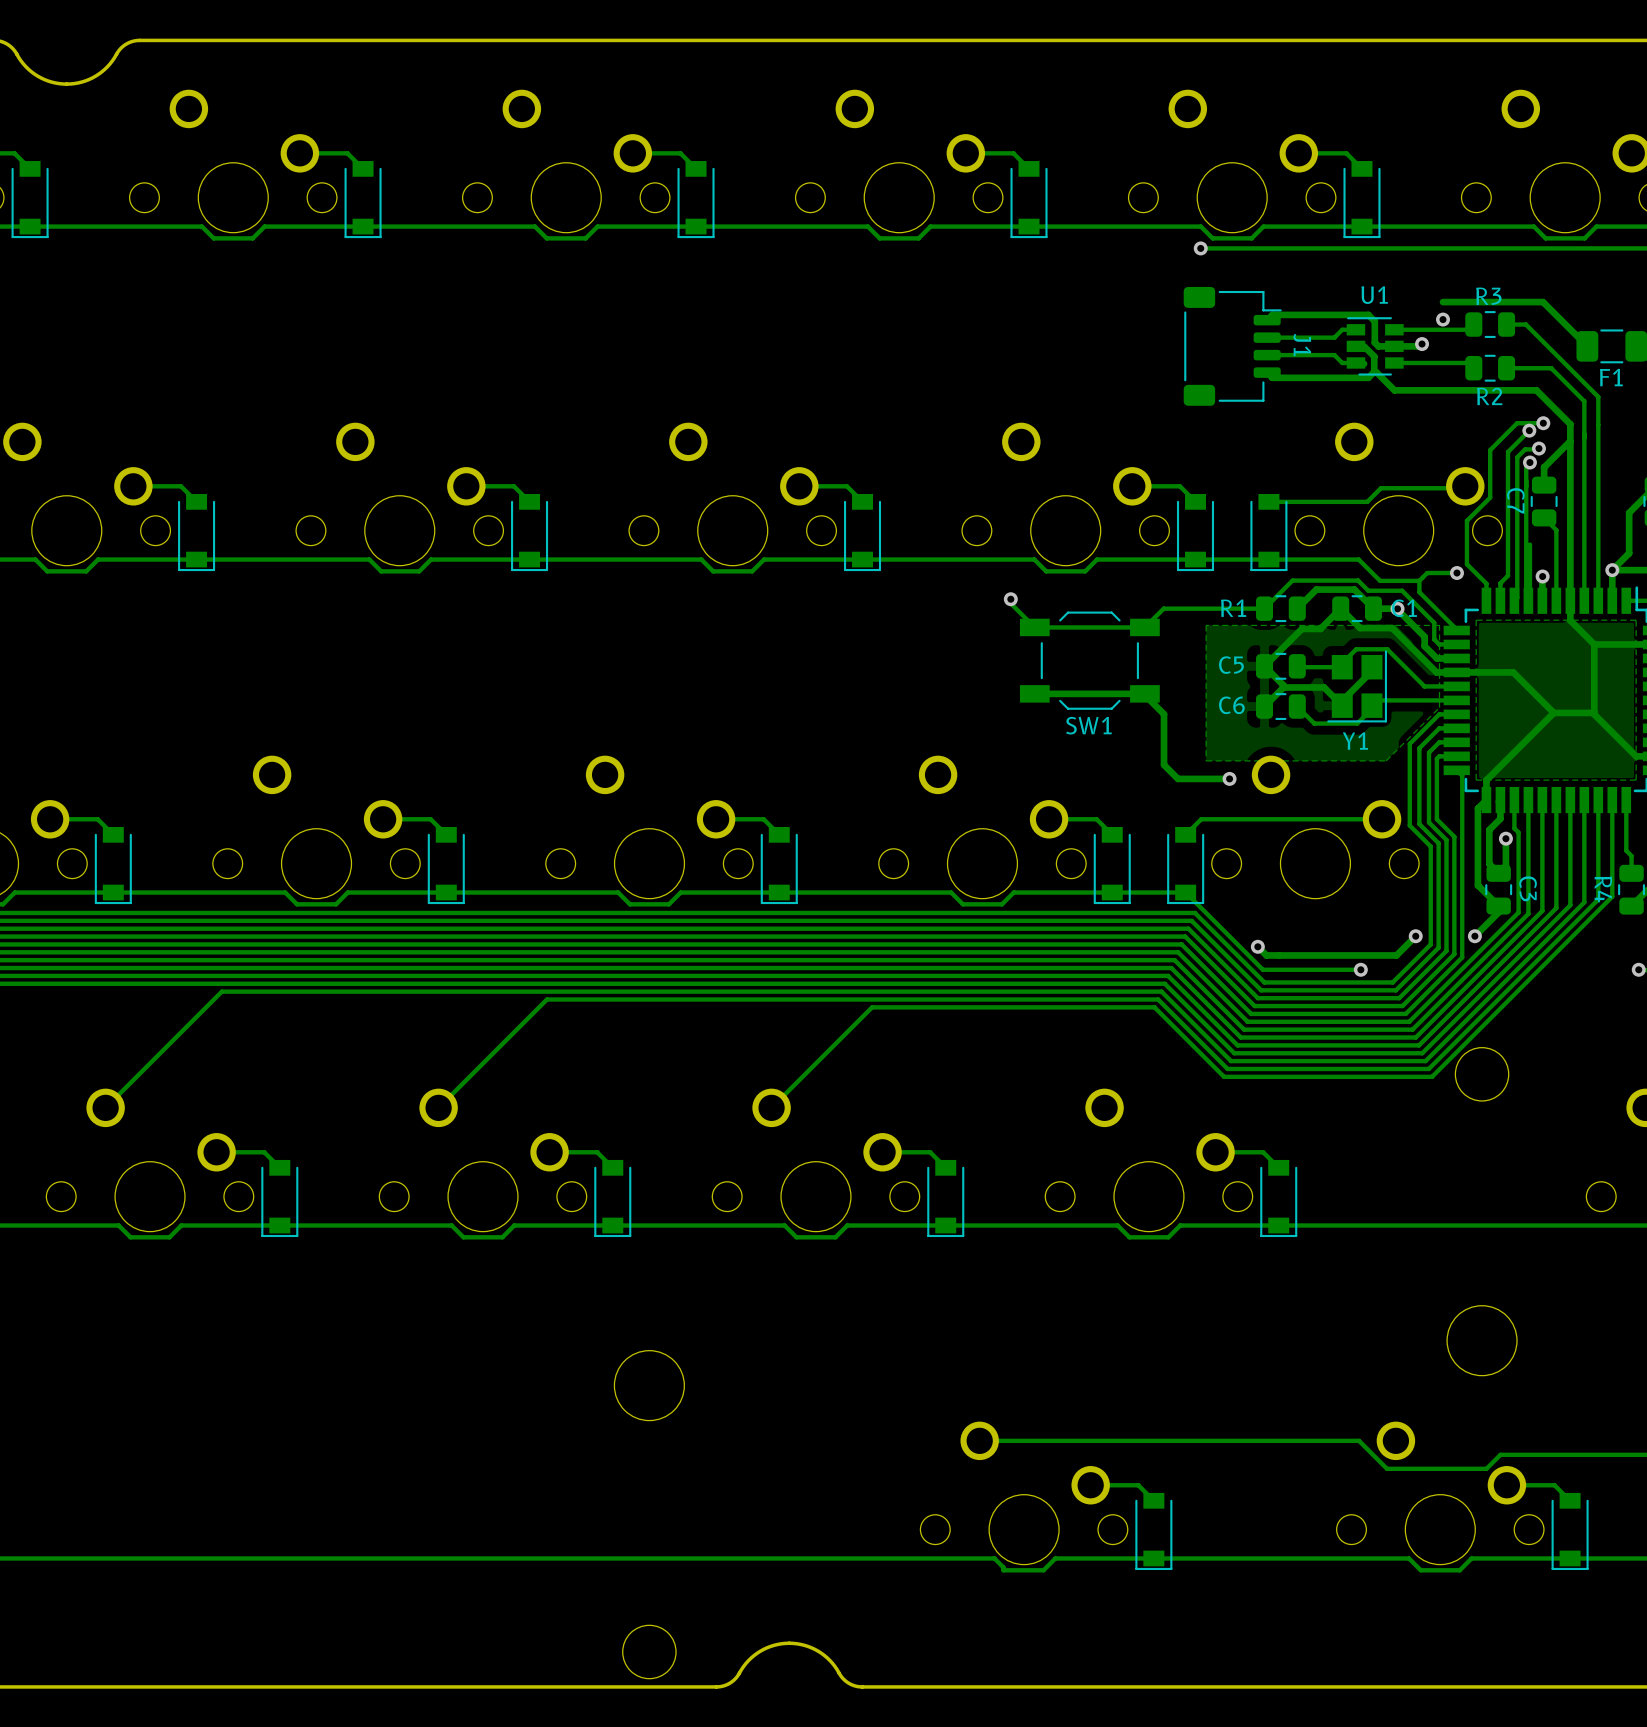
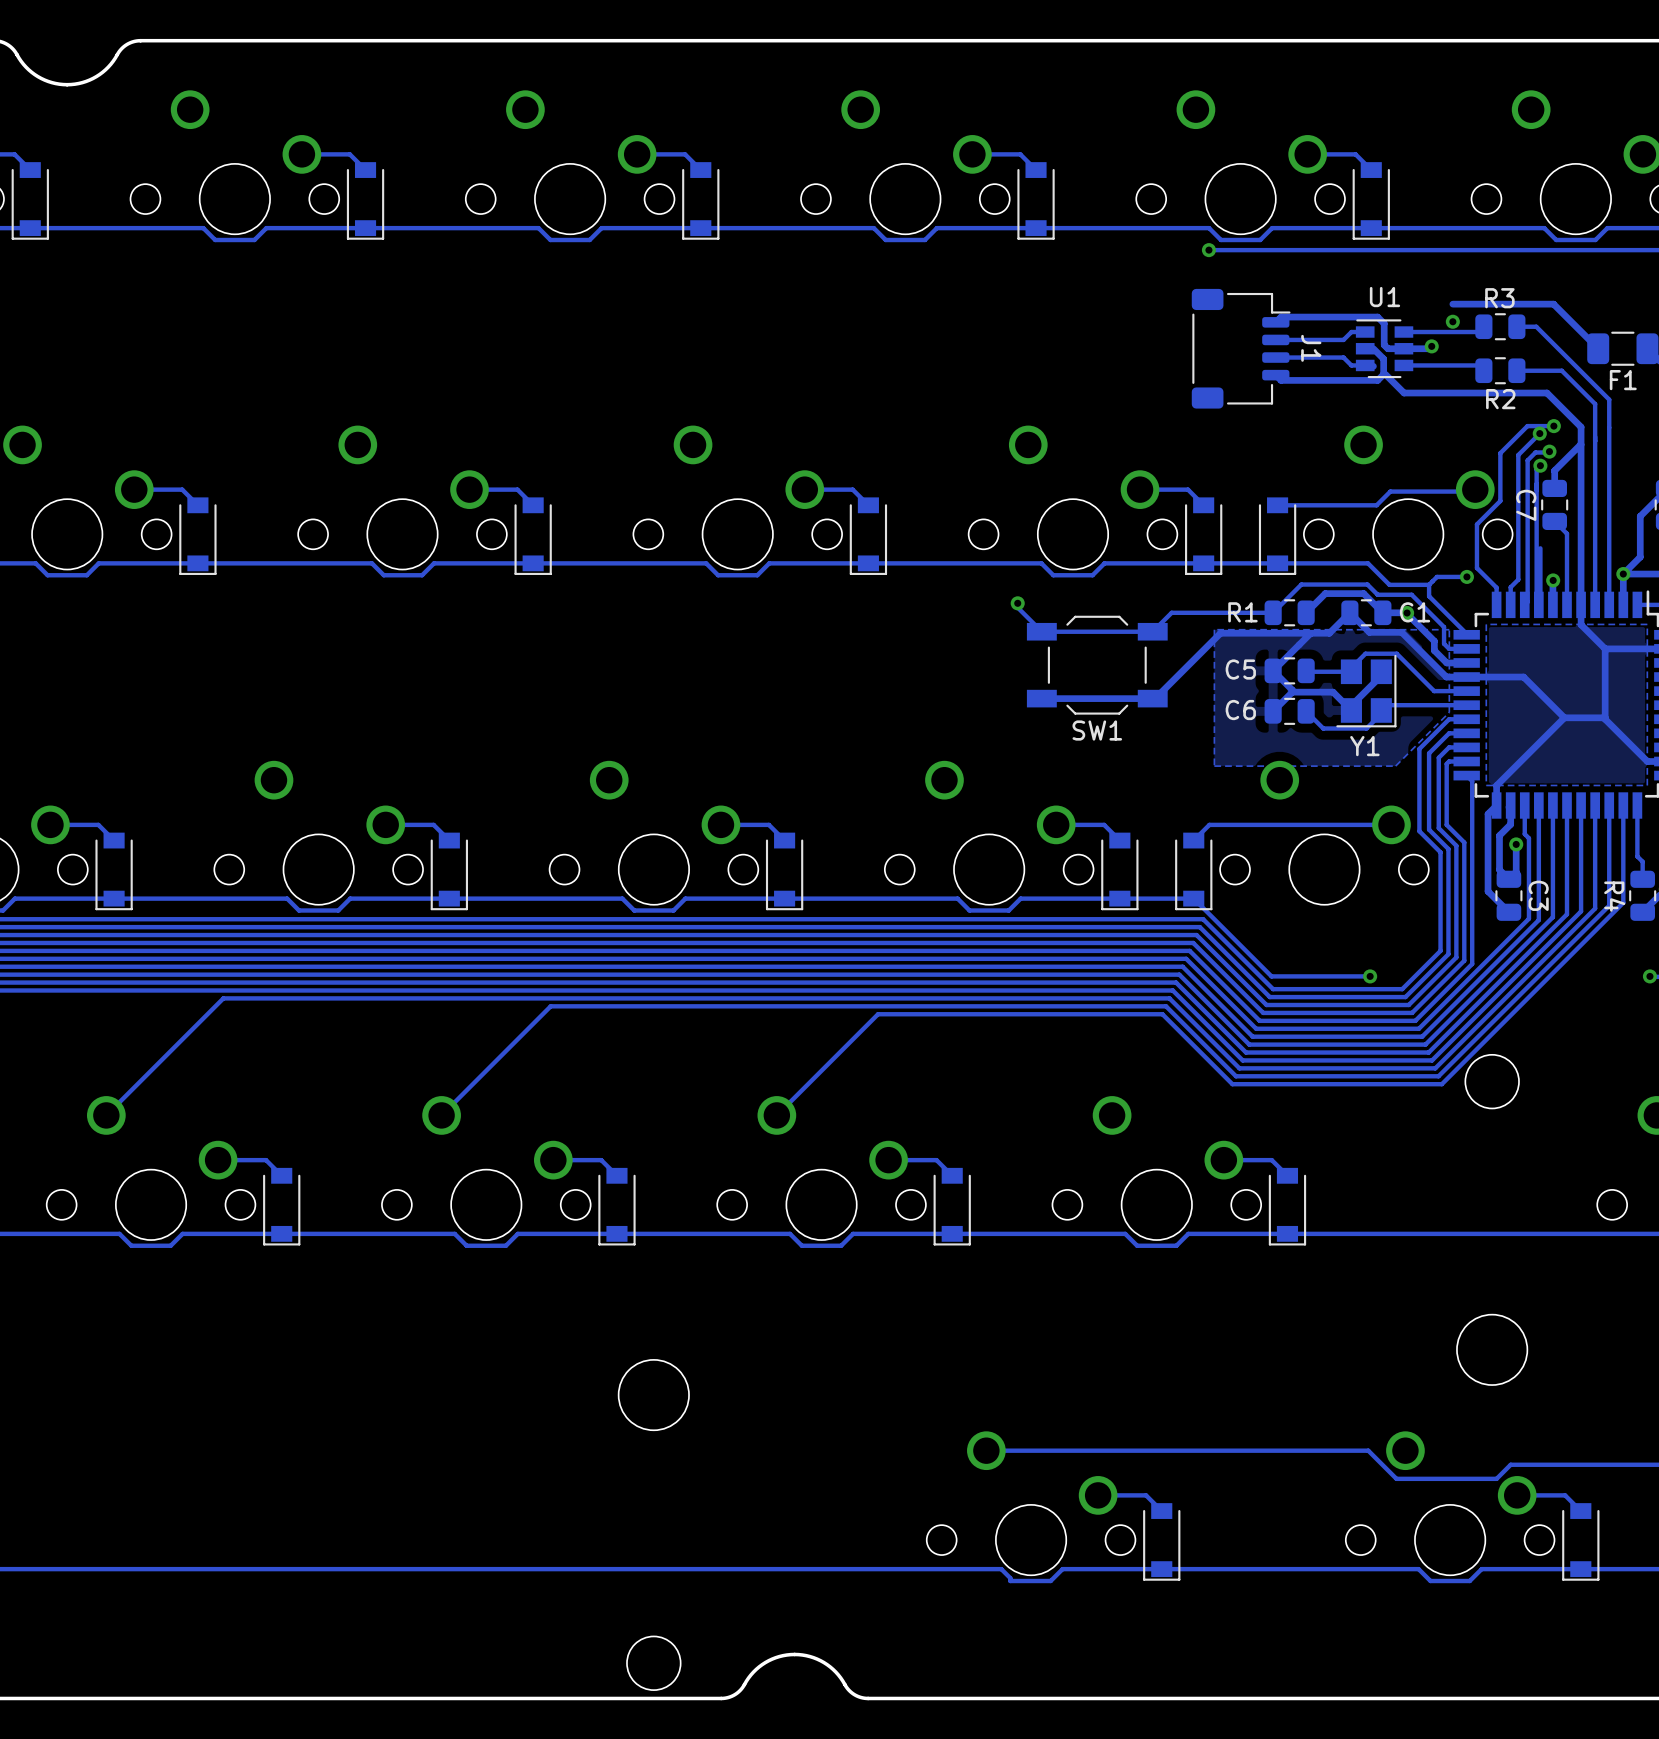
track: none -> (1310, 633) (1220, 633) (1155, 698)
track: (1144, 693) (1164, 714) (1164, 764) (1178, 778) (1229, 778) -> none
via: (1229, 778) -> none
track: (1498, 906) (1498, 912) (1474, 936) -> none
track: (1415, 936) (1396, 955) (1266, 955) (1257, 946) -> none
via: (1415, 936) -> none
via: (1474, 936) -> none
via: (1257, 946) -> none

